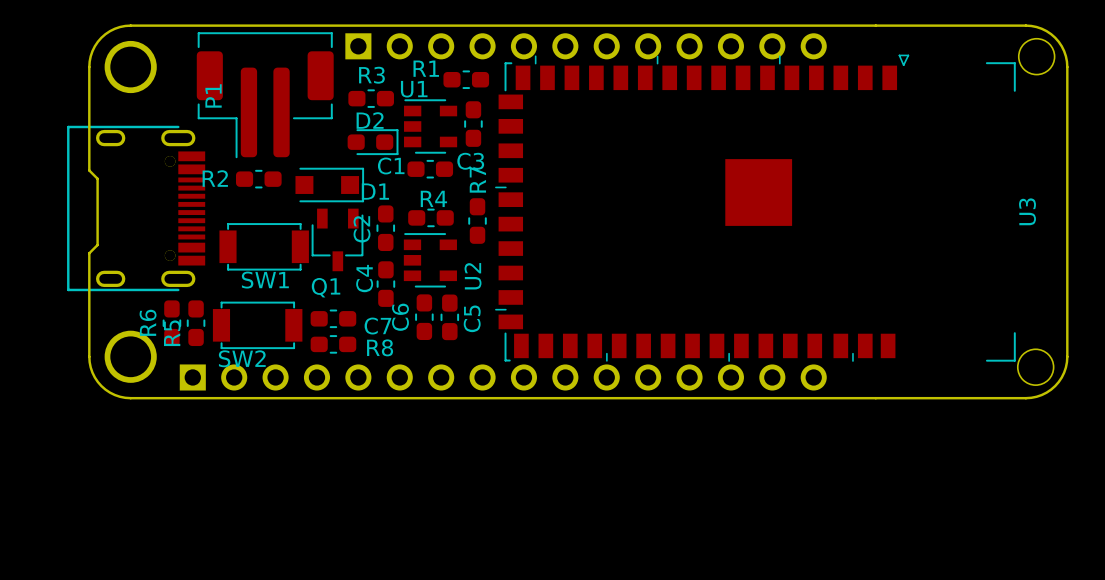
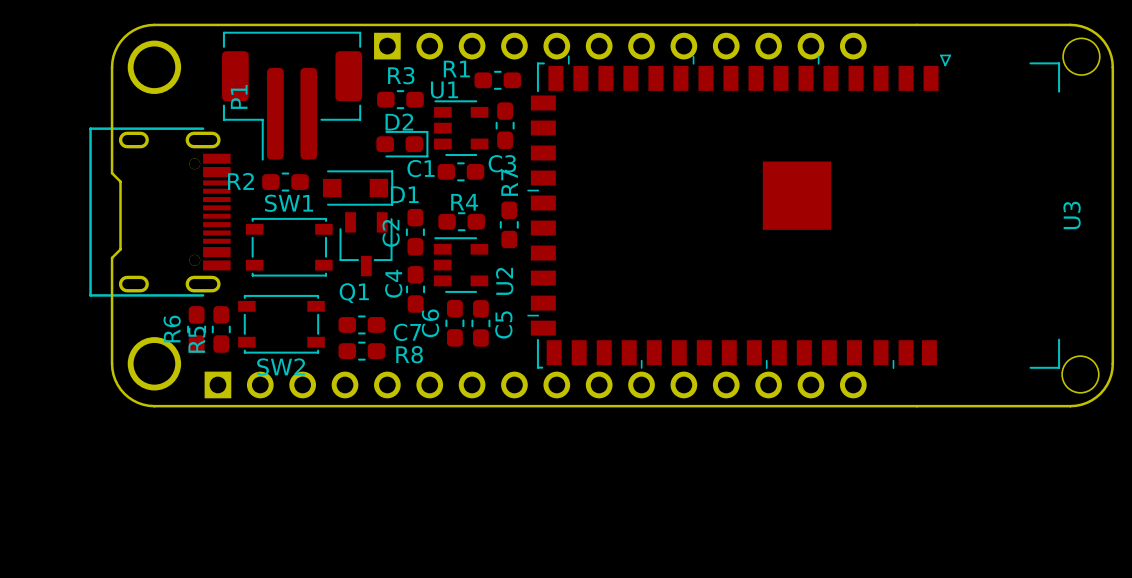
SW1 footprint: [219, 223, 309, 271] -> [245, 217, 333, 277]
SW1 name position: SW1 (265, 280) -> SW1 (289, 203)
SW2 footprint: [212, 301, 303, 350] -> [238, 294, 325, 354]

